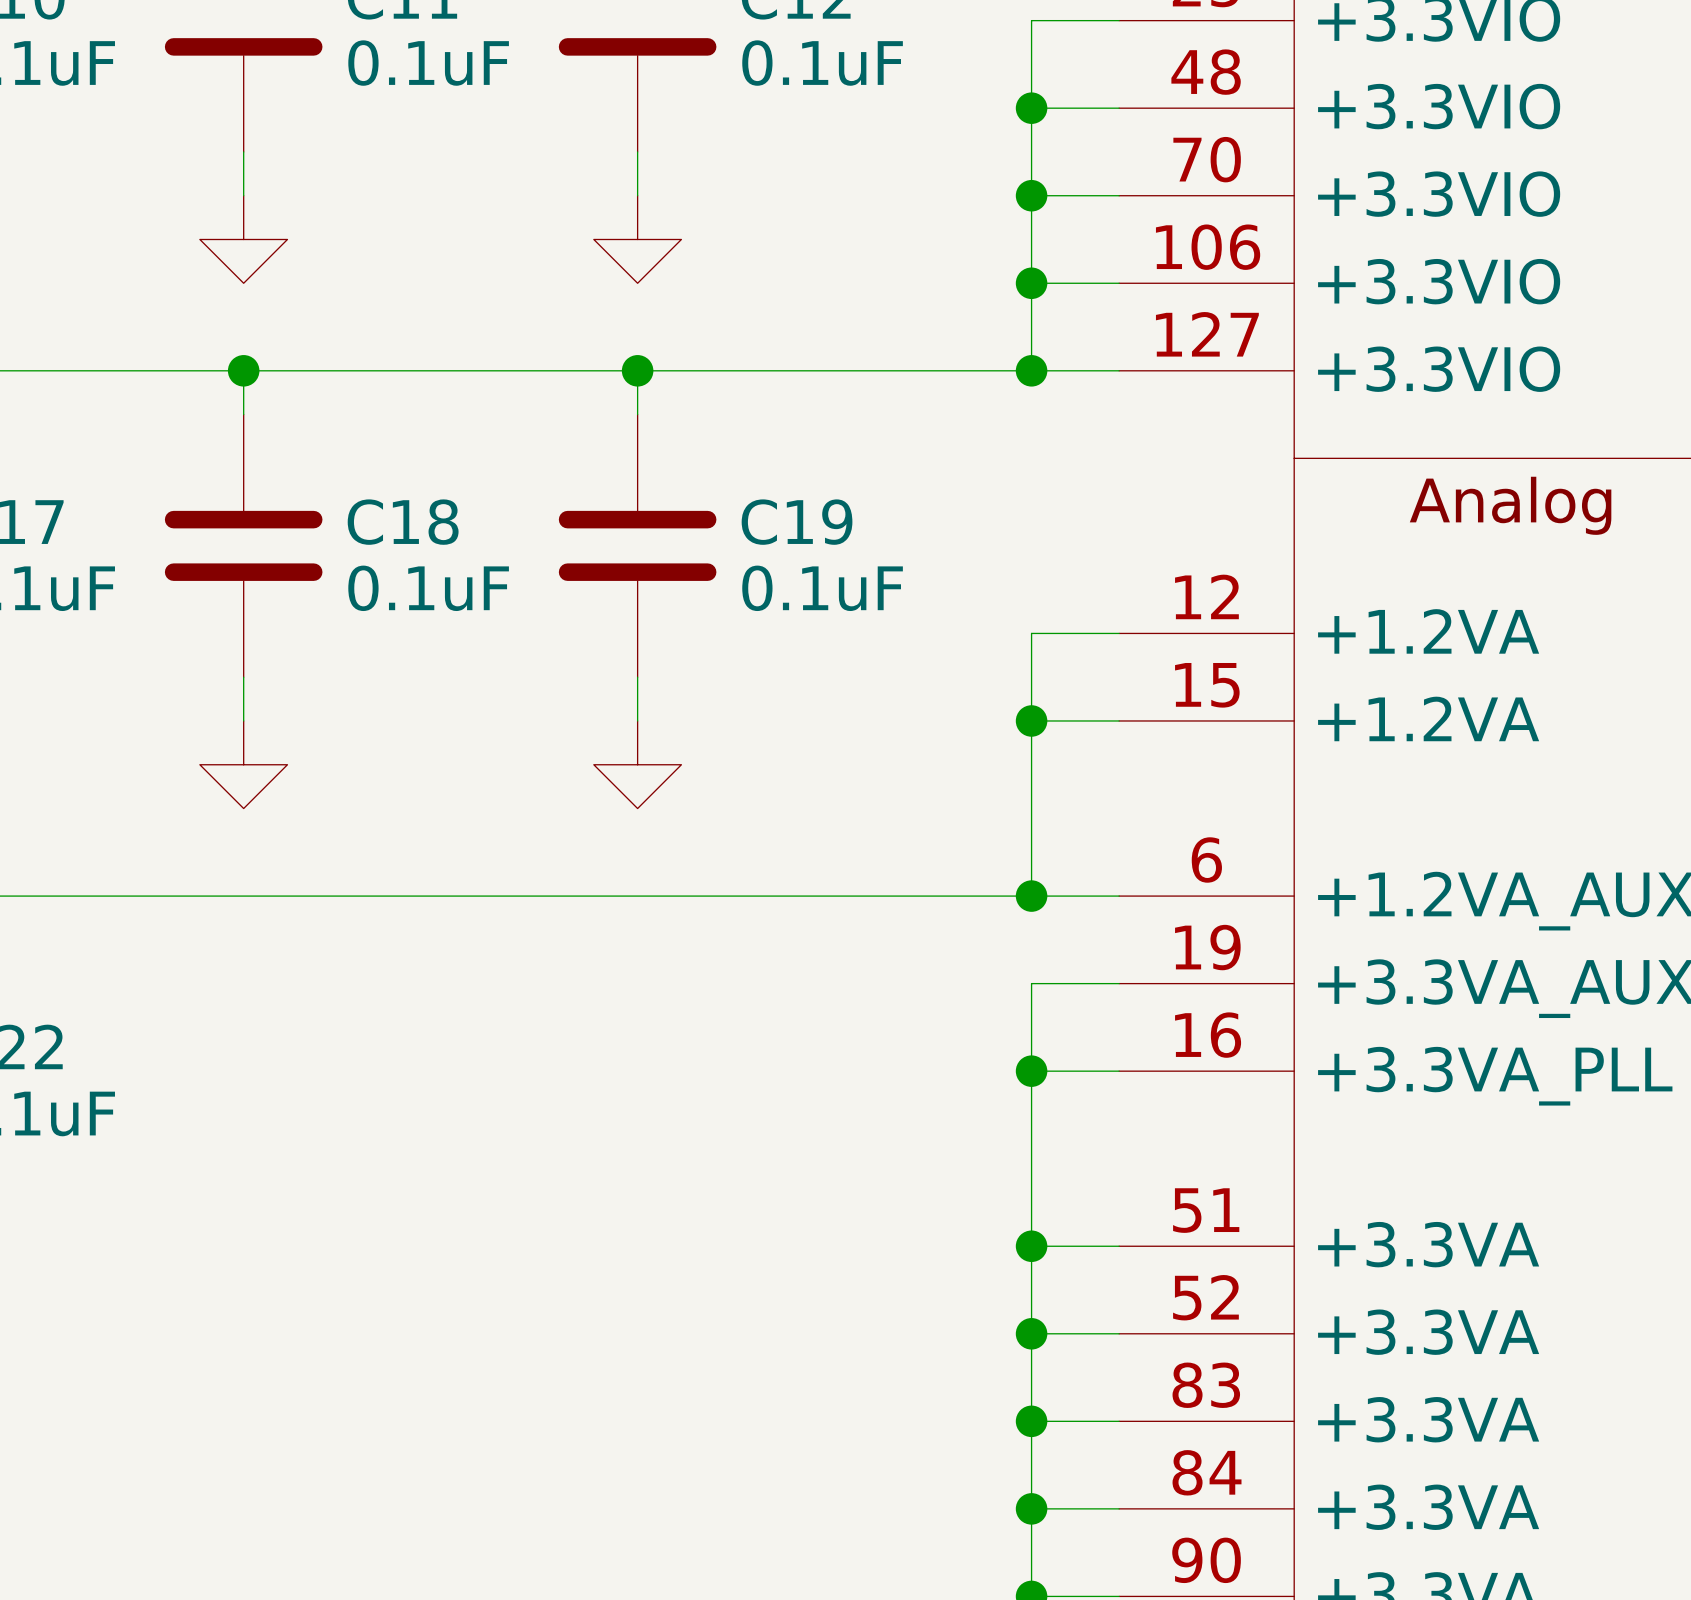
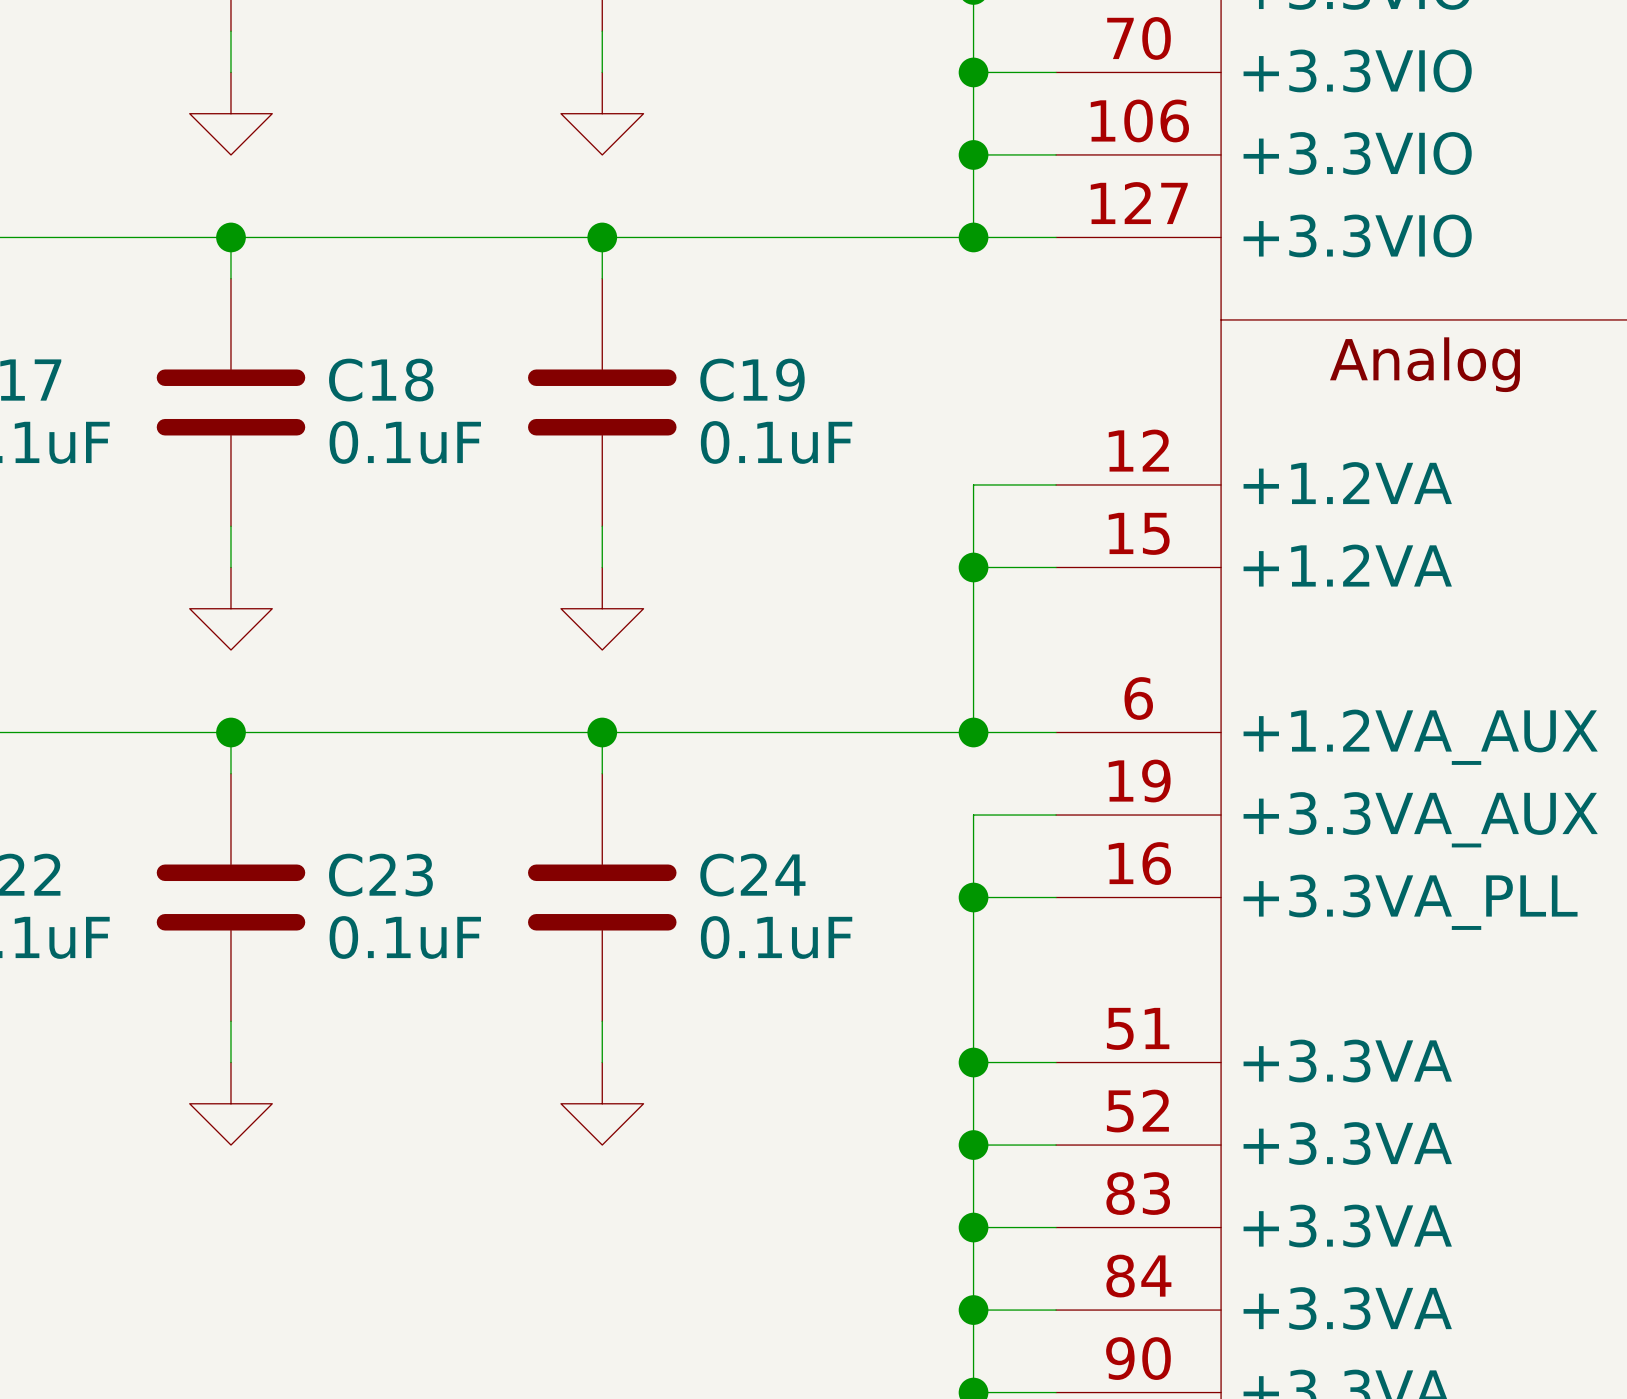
wire: none -> (230, 732) (230, 773)
junction: none -> (230, 732)
wire: none -> (602, 732) (602, 773)
junction: none -> (602, 732)
C23: none -> 0.1uF (230, 897)
C24: none -> 0.1uF (602, 897)
wire: none -> (230, 1021) (230, 1062)
wire: none -> (602, 1021) (602, 1062)
power symbol: none -> (230, 1103)
power symbol: none -> (602, 1103)

